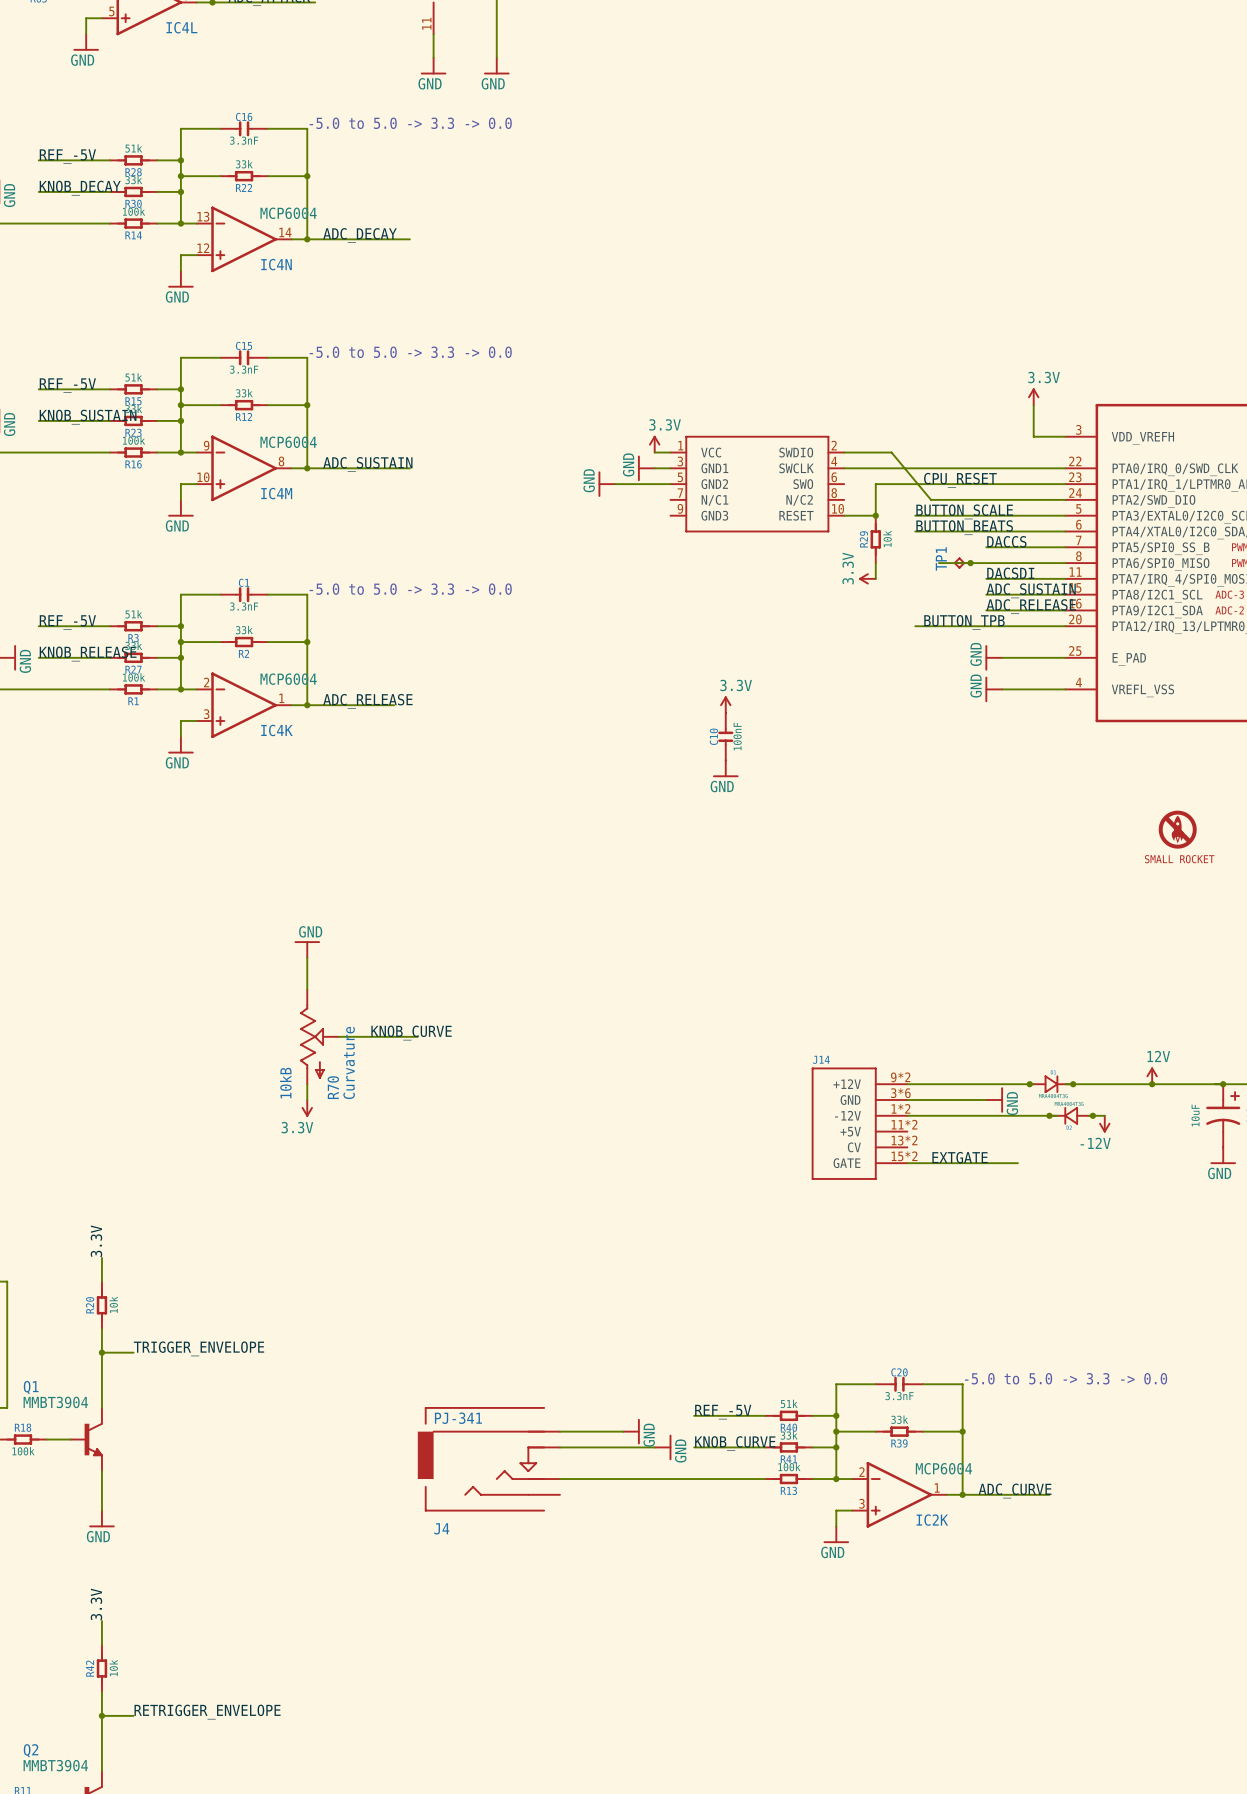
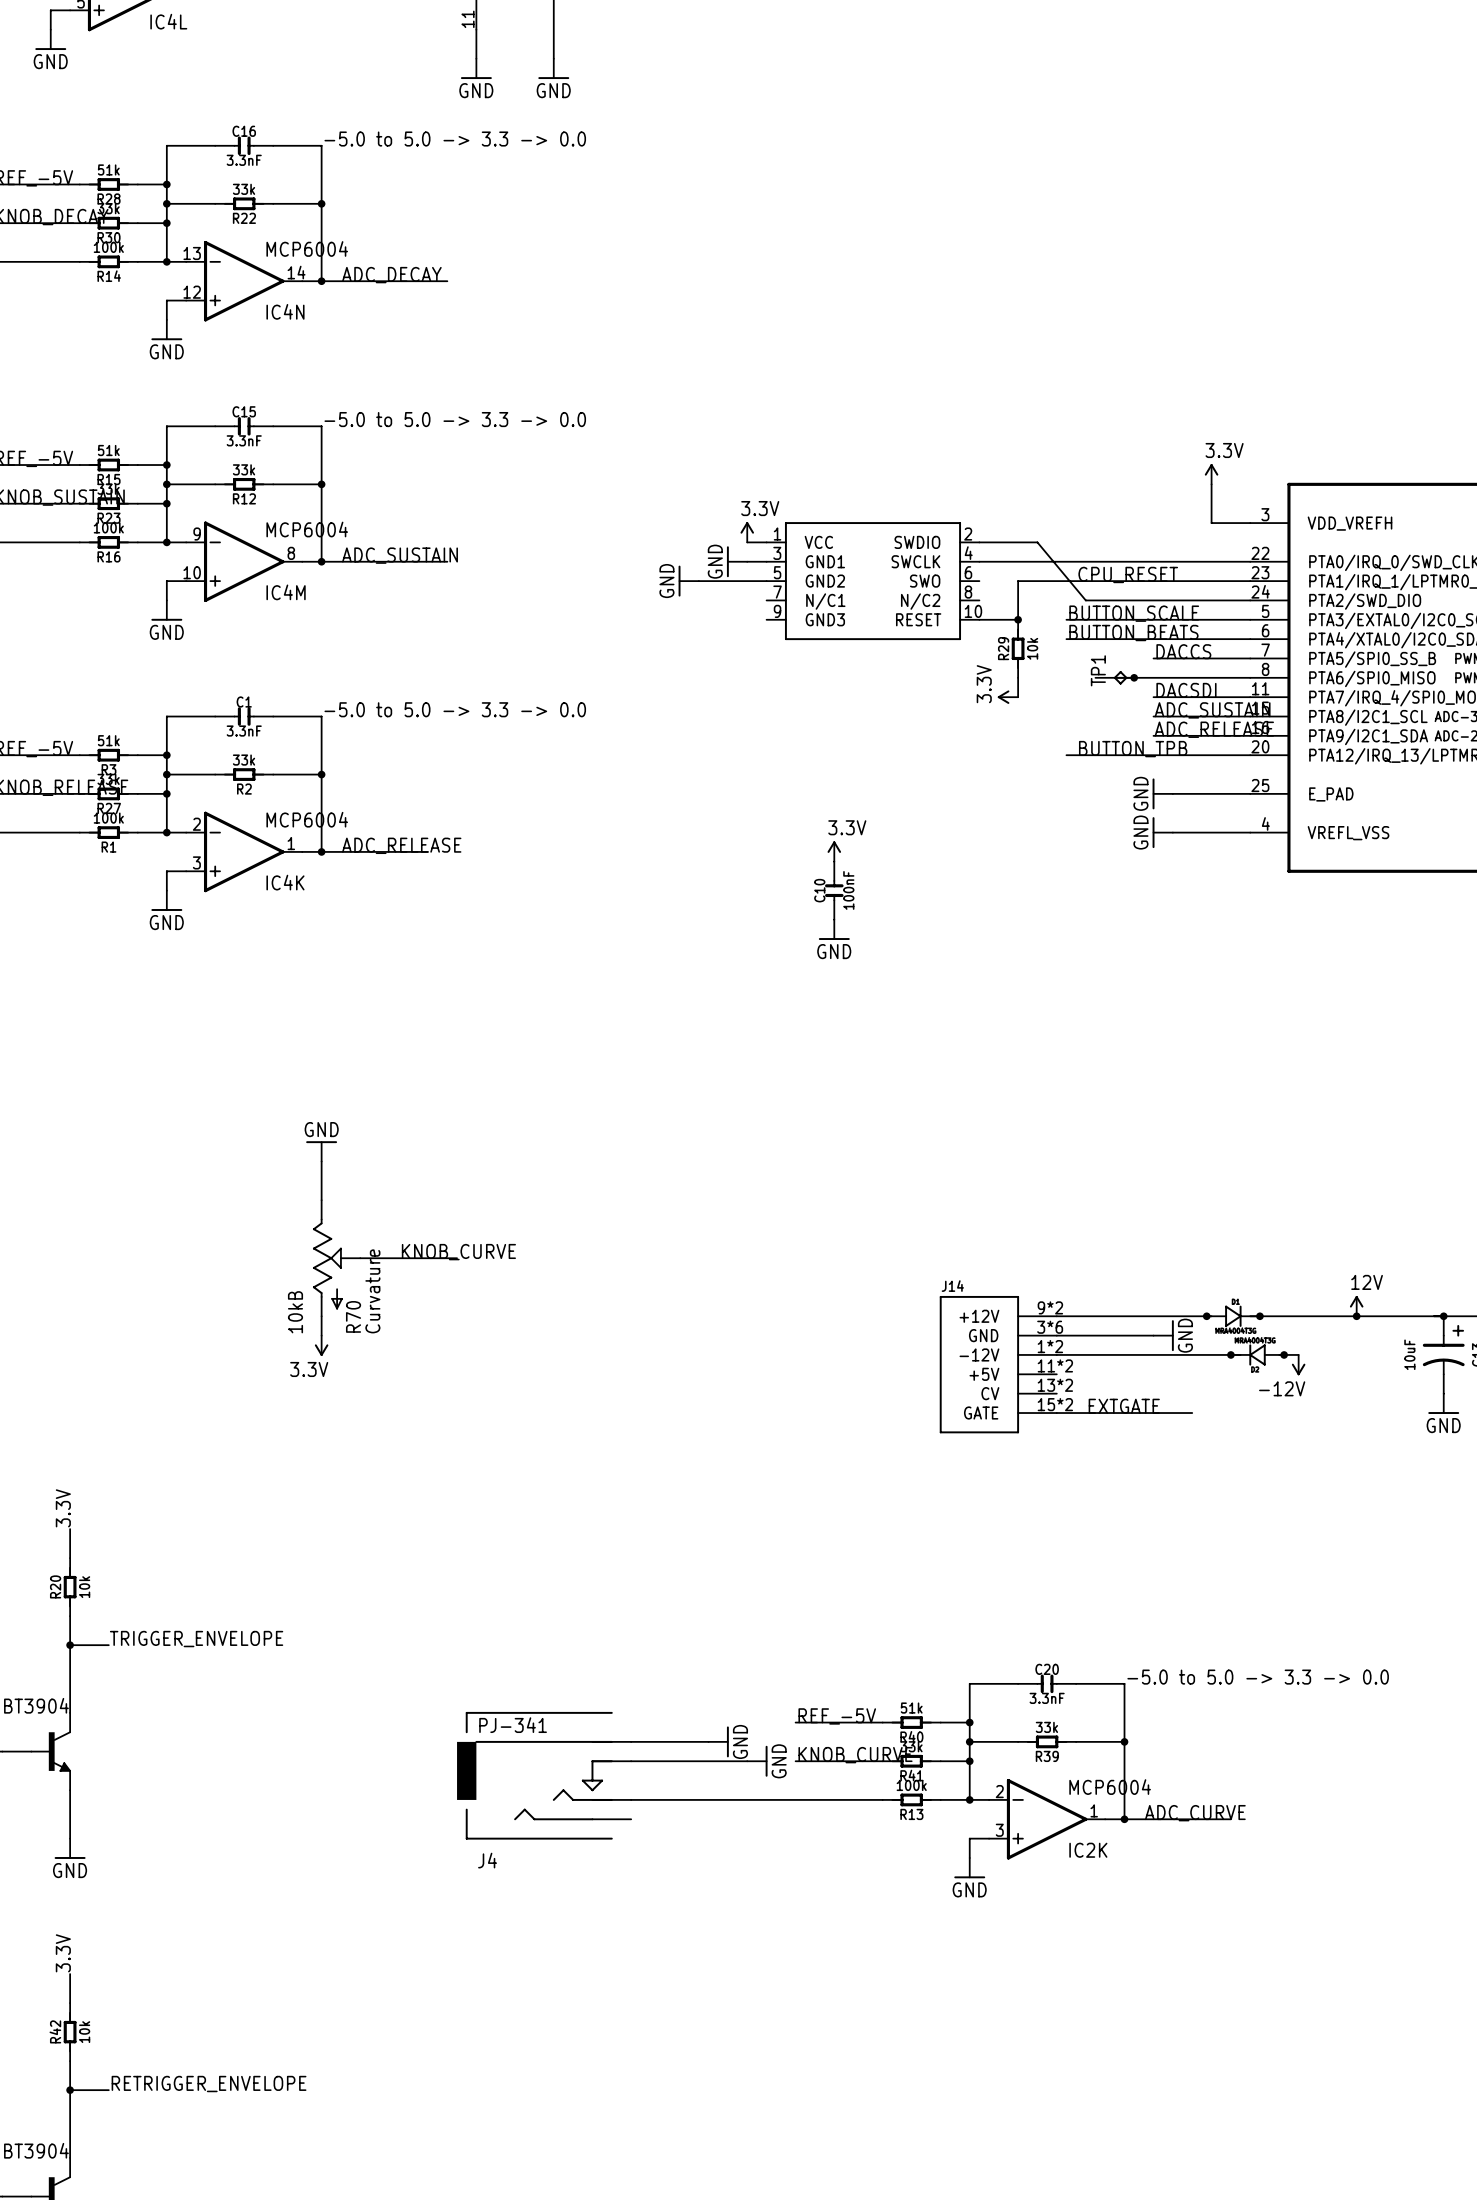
part: (1177, 829) -> none

